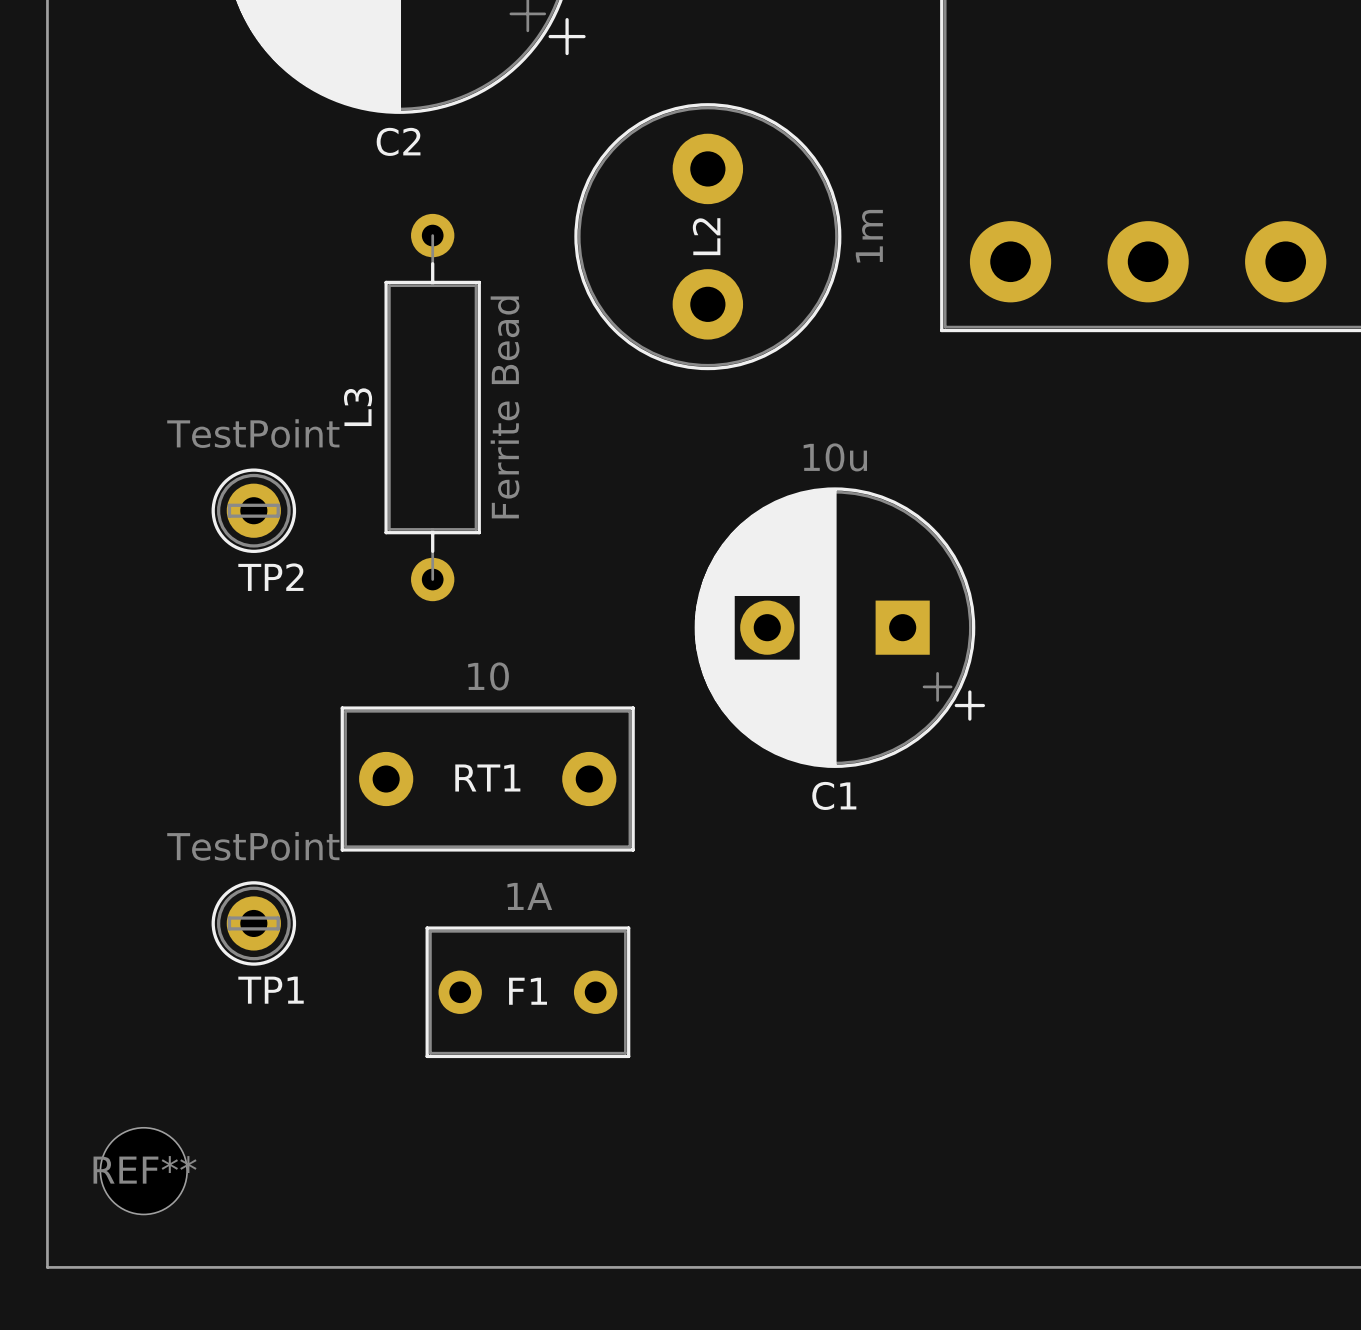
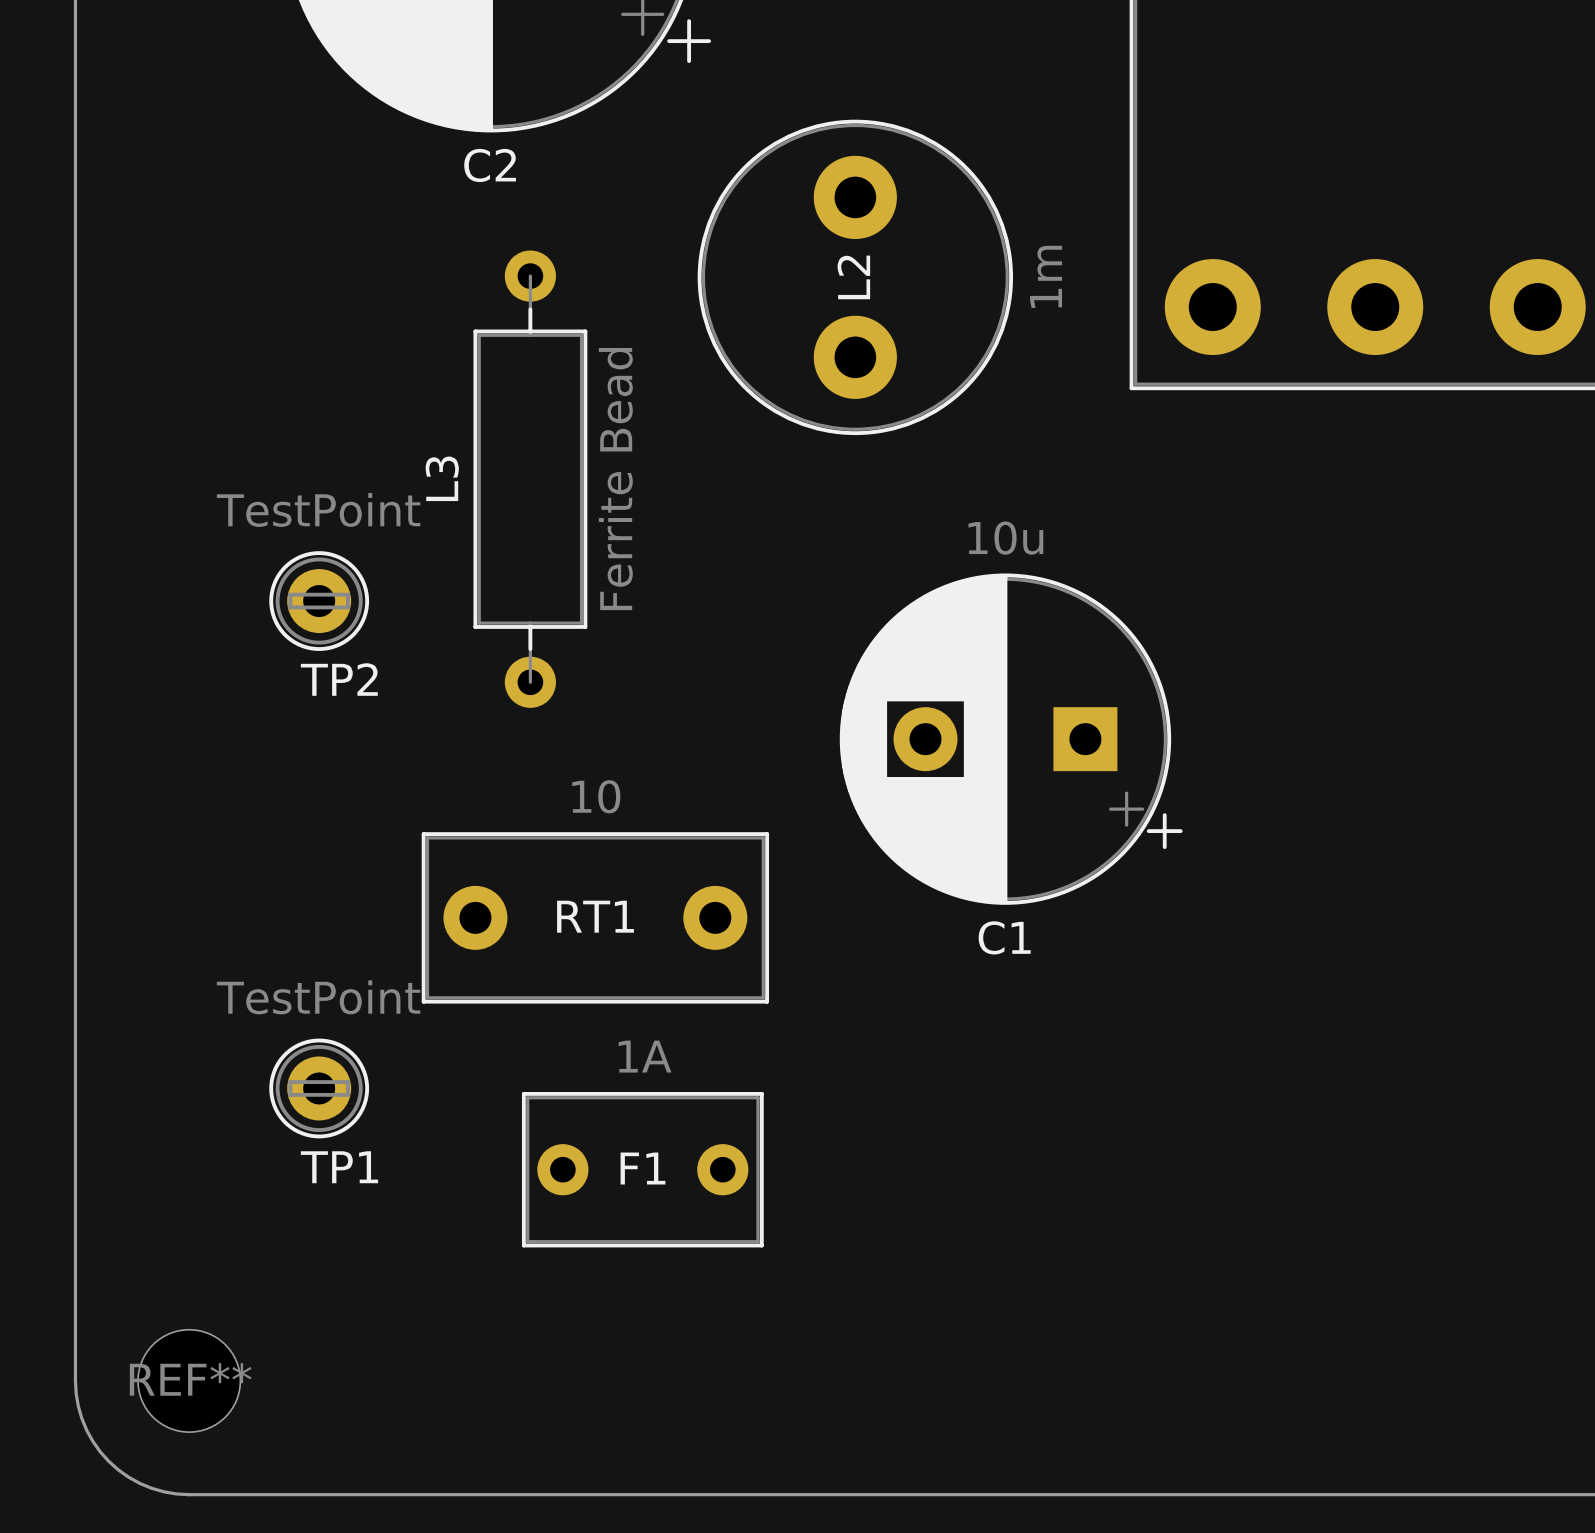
board edge: (47, 1171) (47, 1267) (143, 1267) -> (75, 1380) (78, 1406) (86, 1430) (108, 1461) (128, 1477) (151, 1488) (189, 1494)

